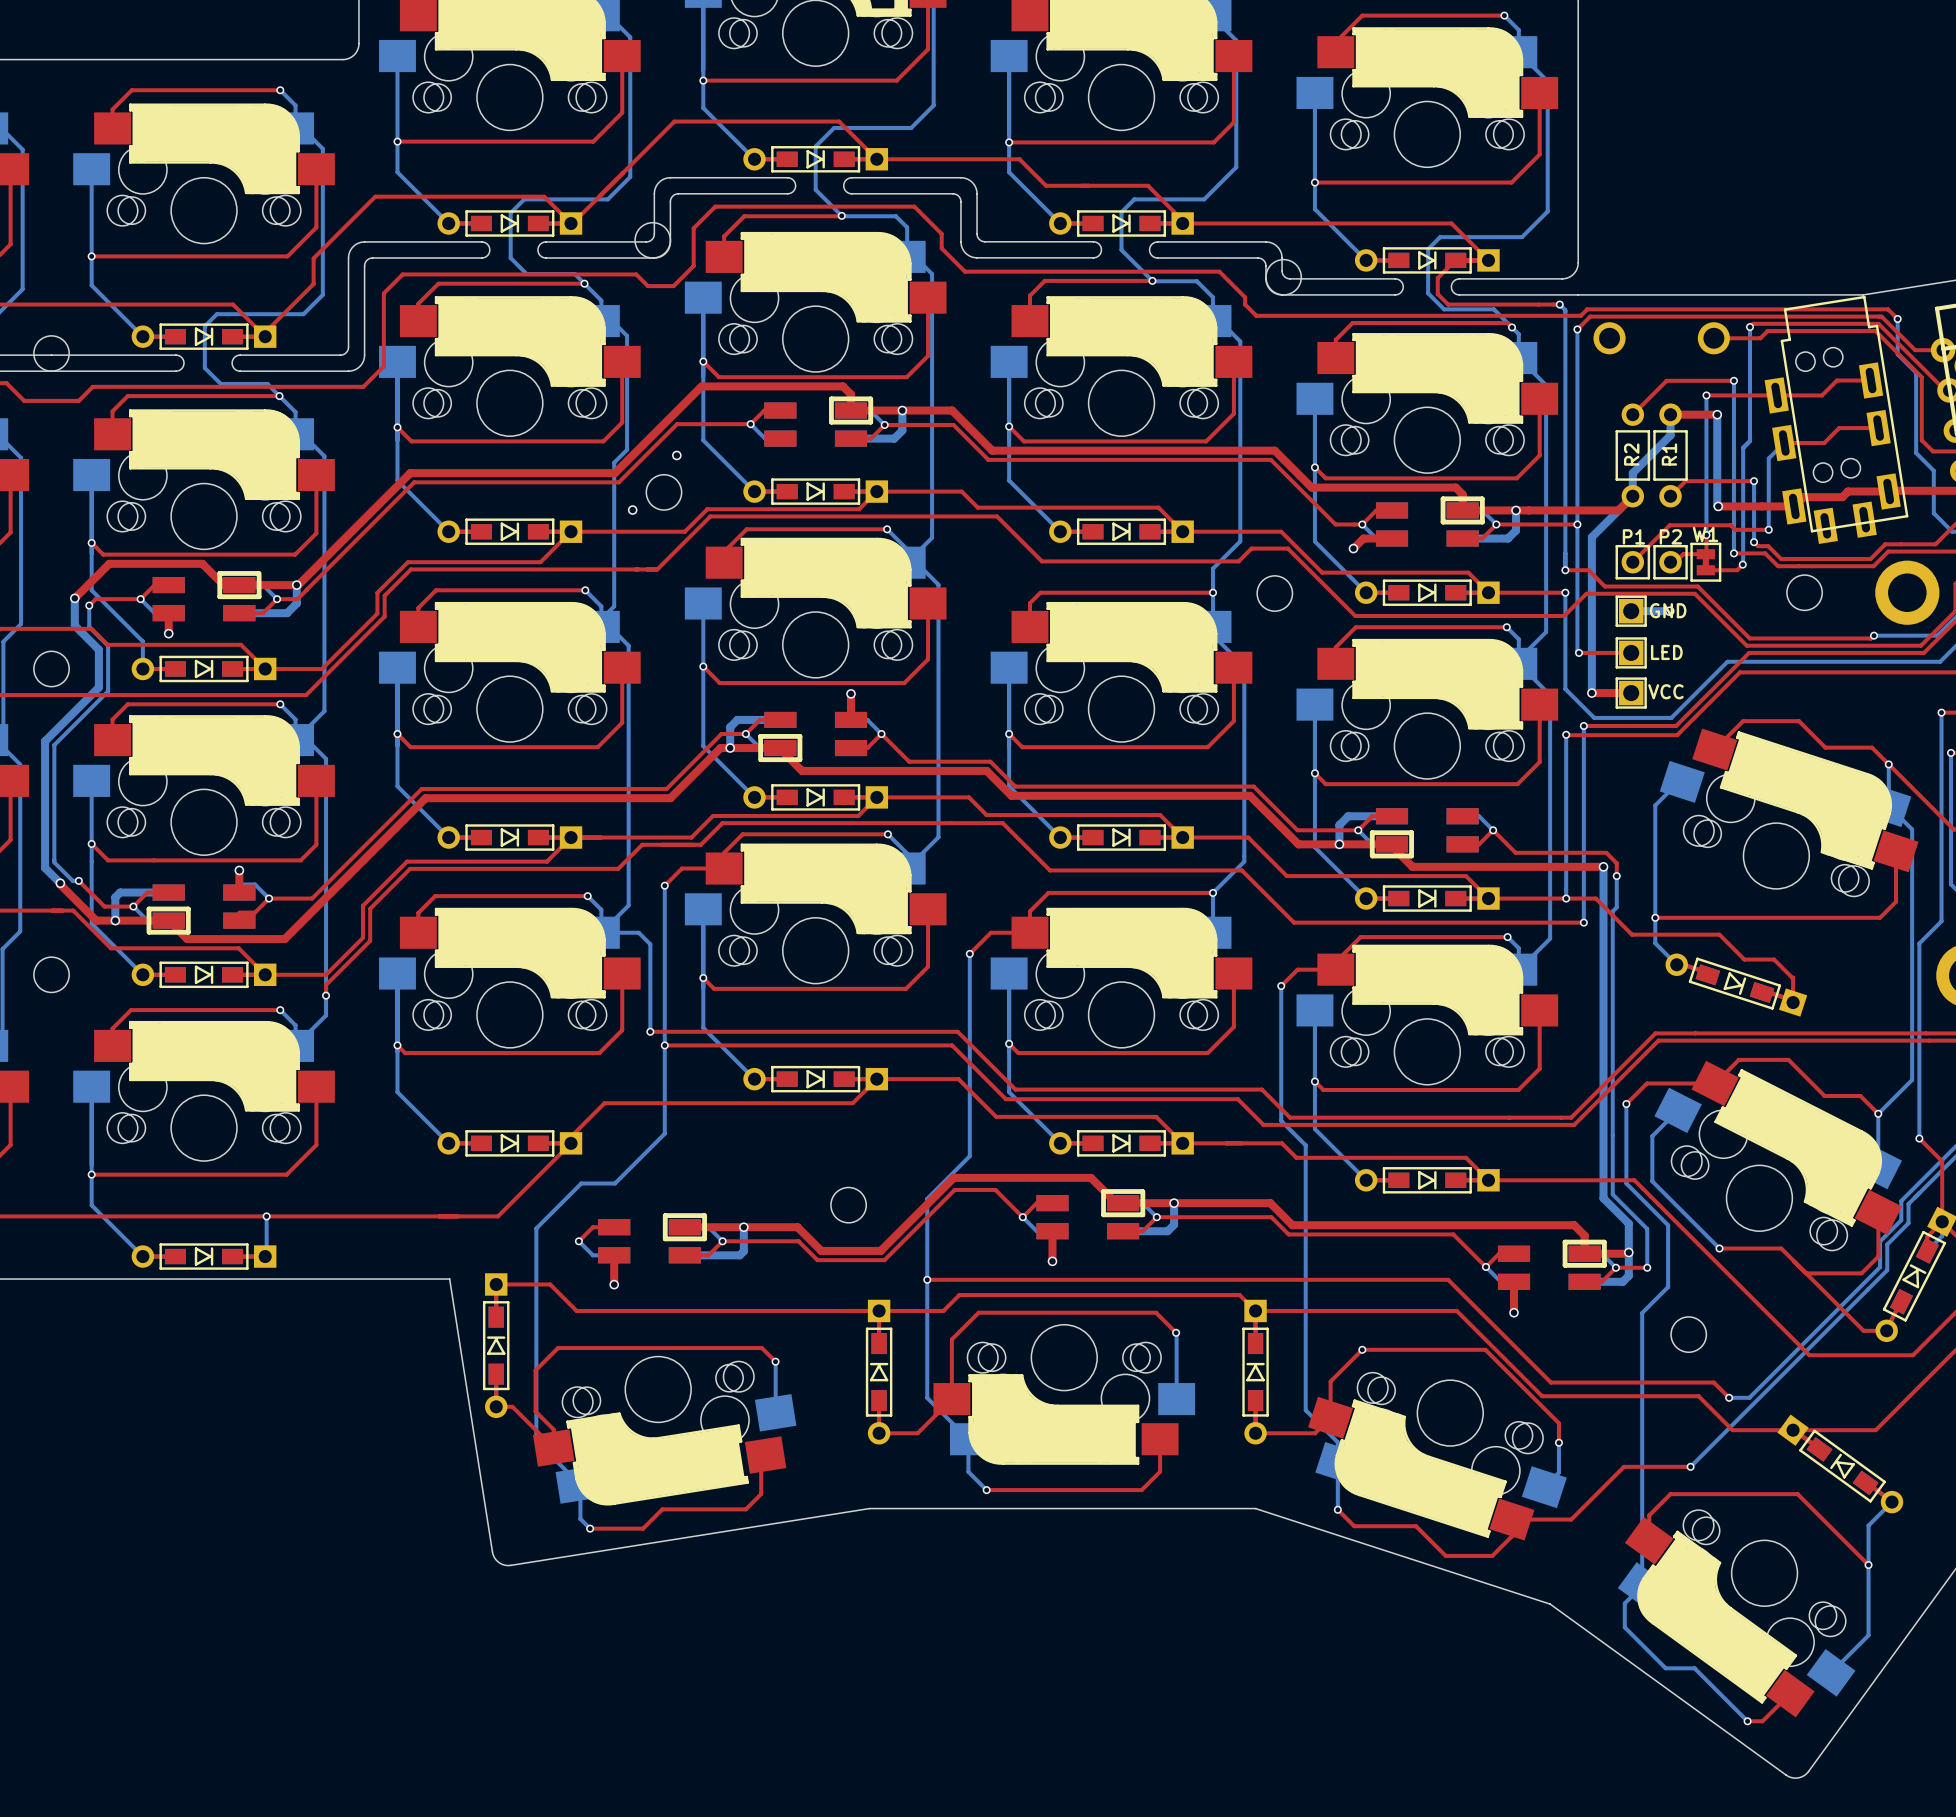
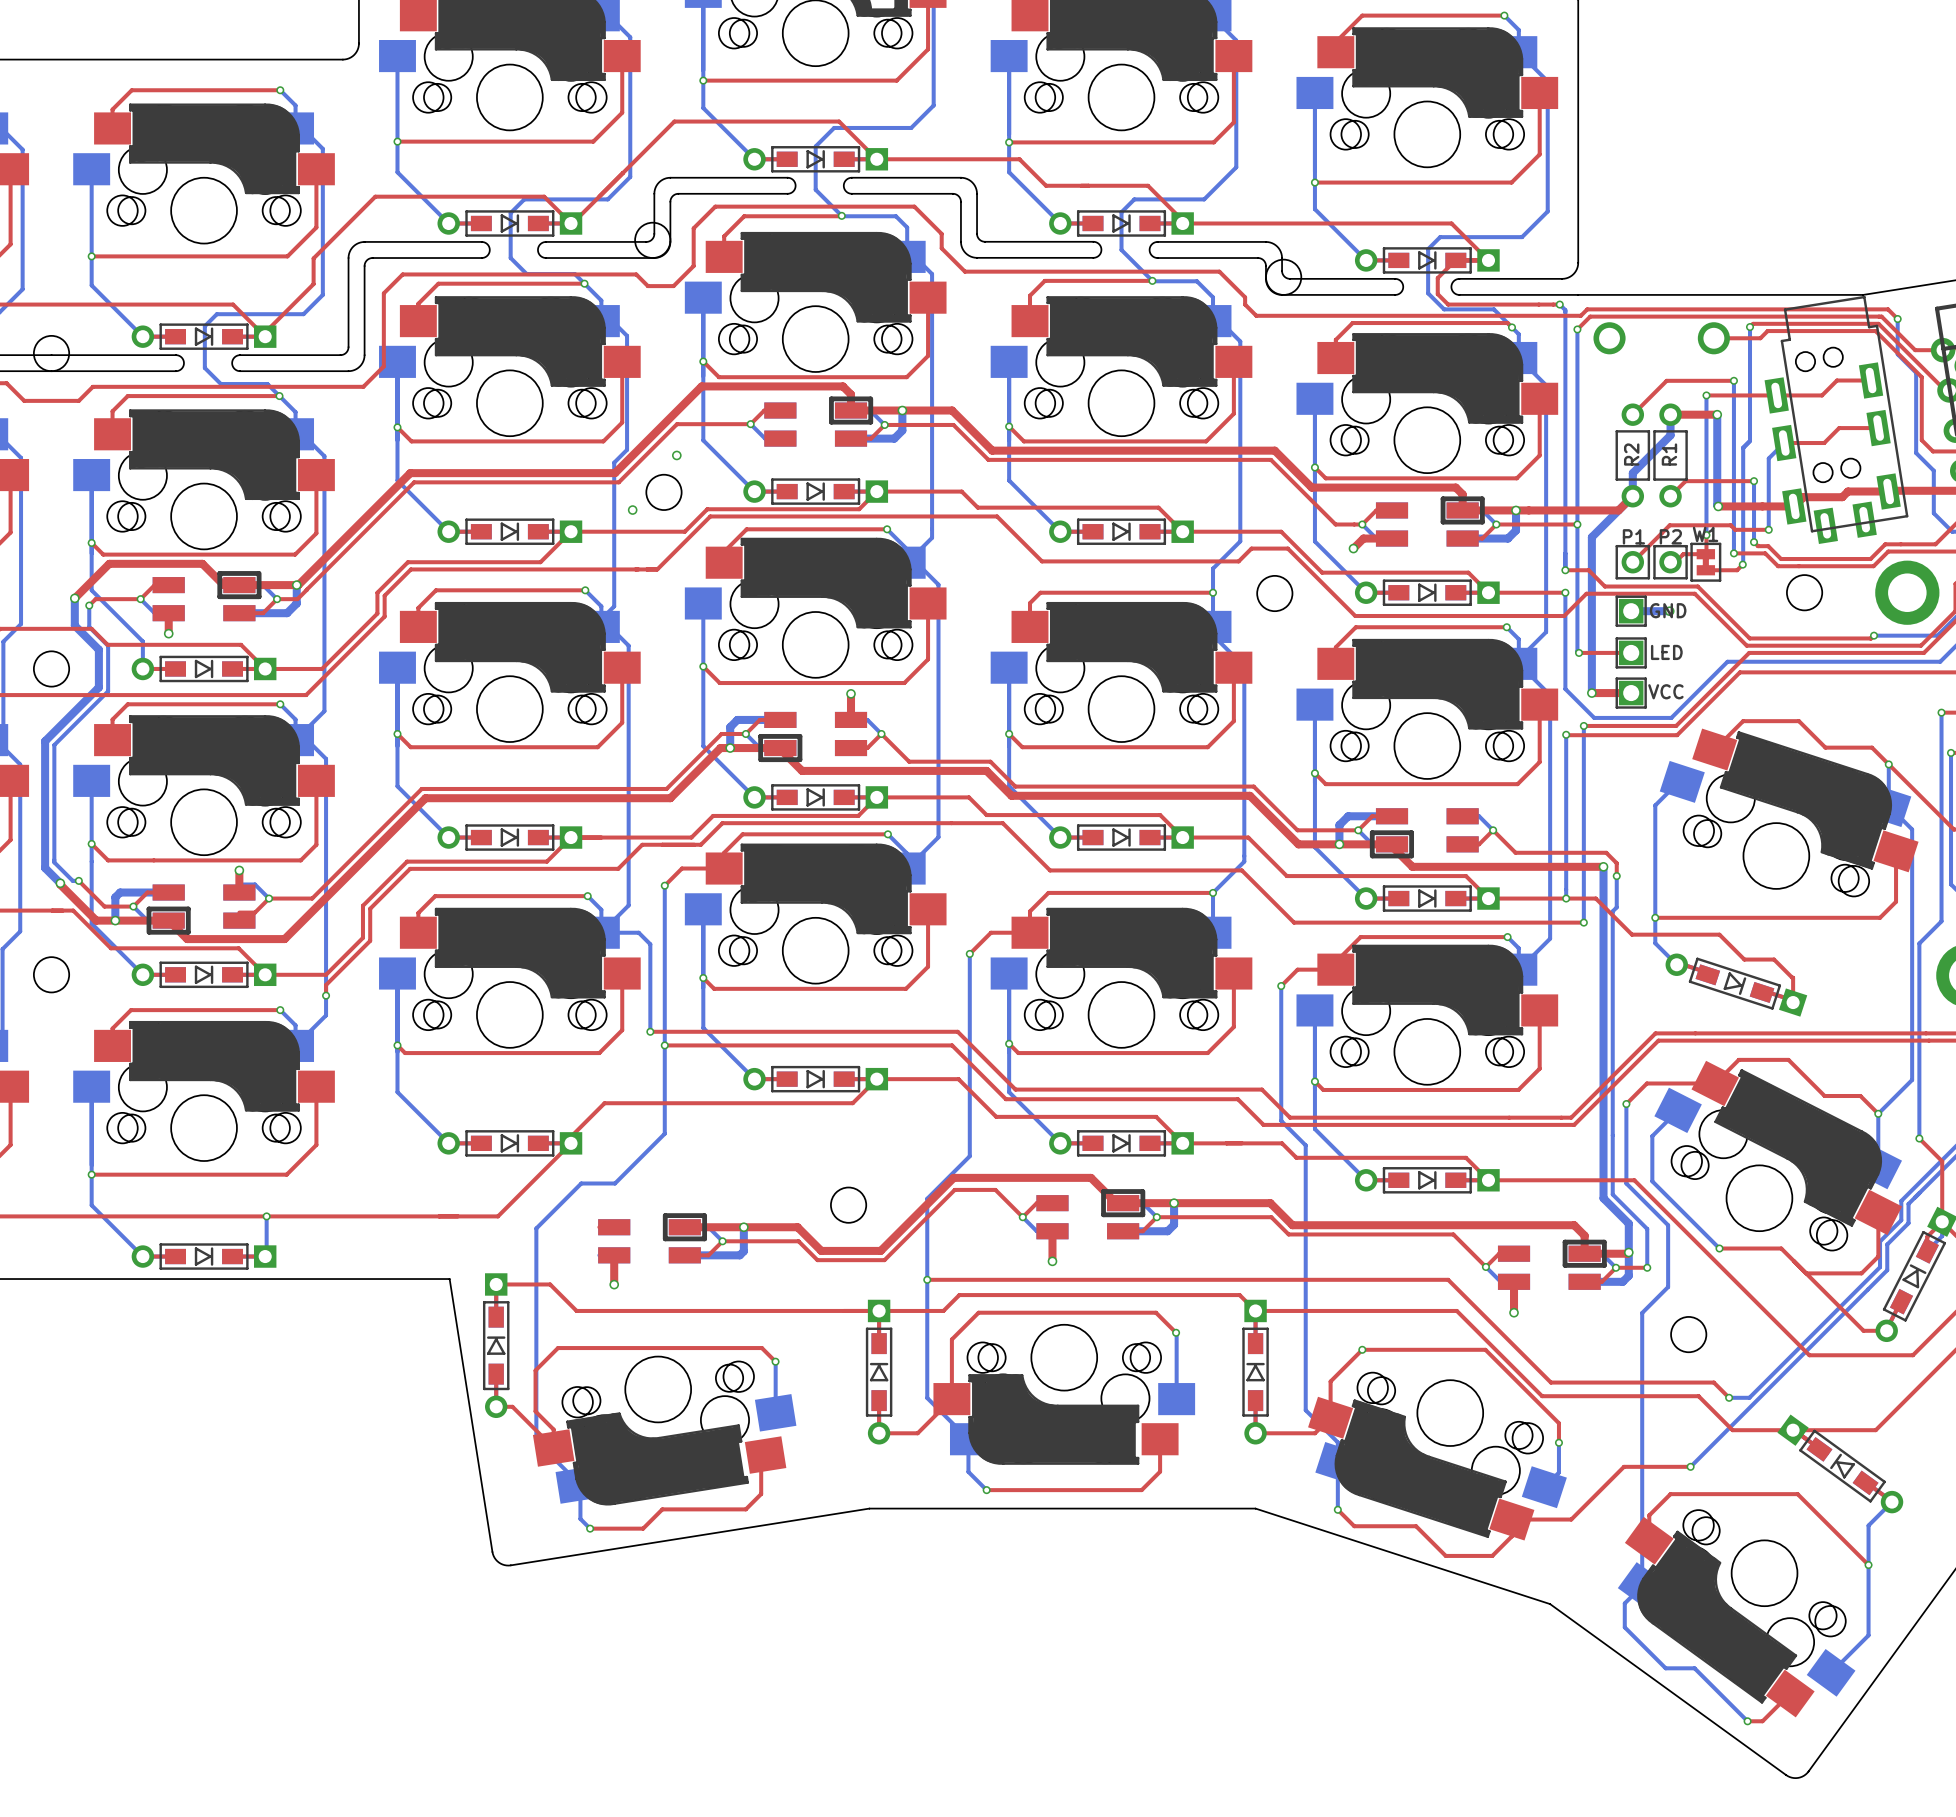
top track: (599, 1227) (592, 1227) (578, 1241) -> none
bottom track: (578, 1241) (592, 1255) (599, 1255) -> none
via: (578, 1241) -> none

